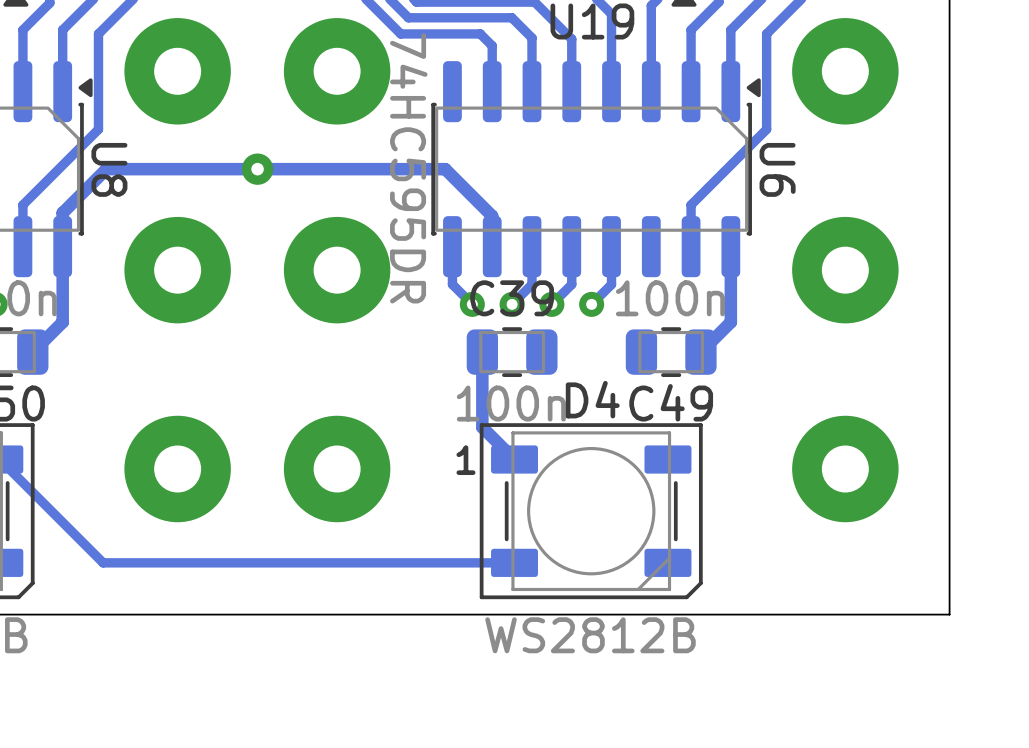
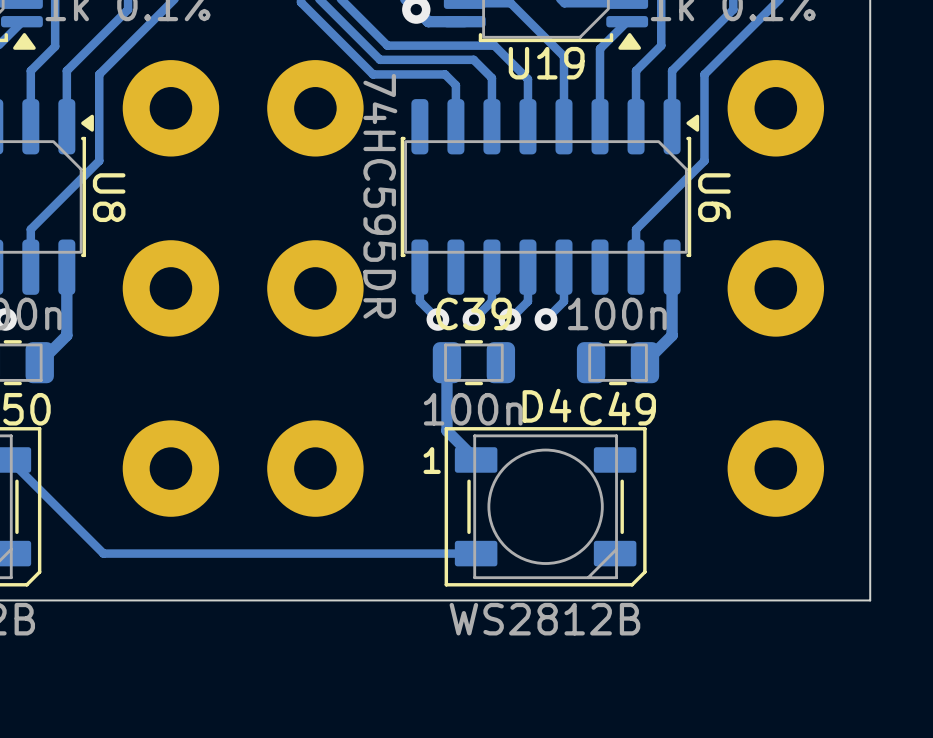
via: (257, 169) -> none
track: (492, 246) (492, 216) (445, 169) (106, 169) (62, 212) (62, 246) -> none

